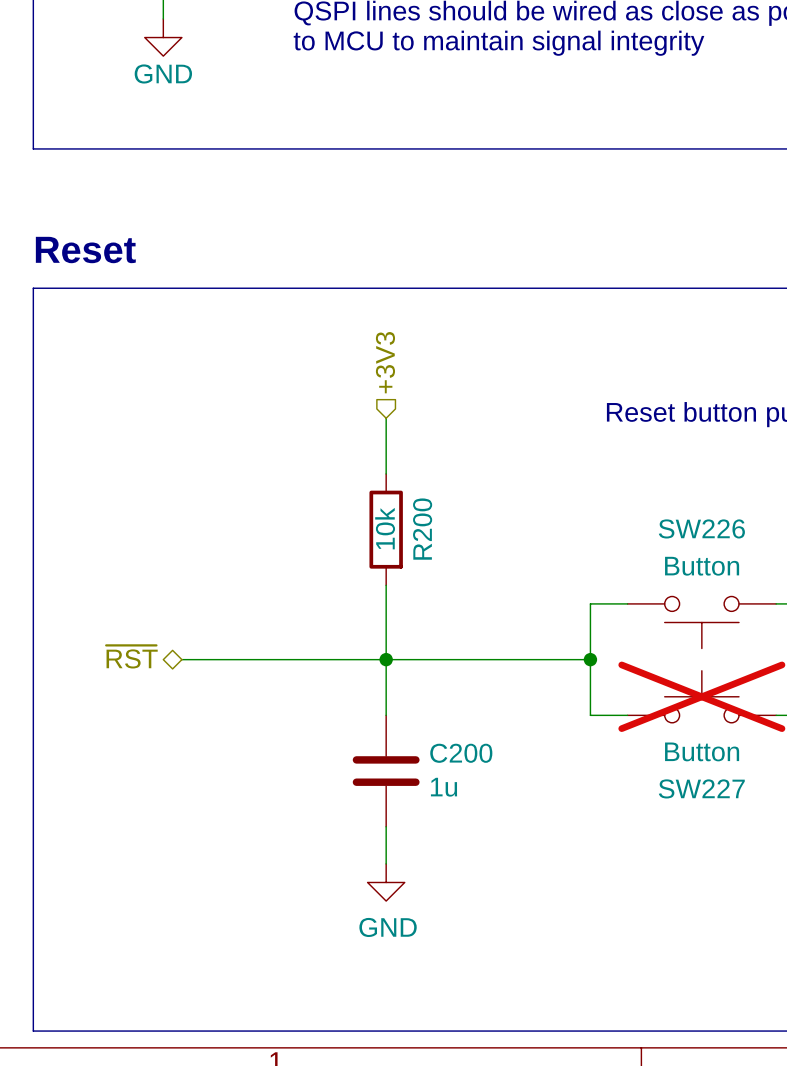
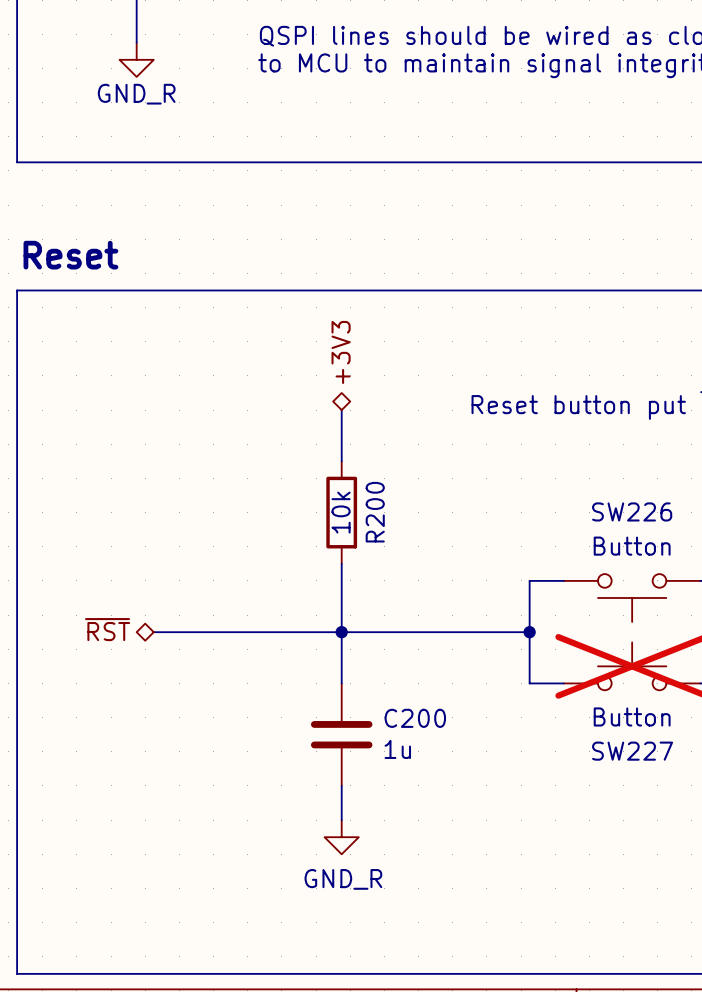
power symbol: GND (163, 37) -> GND_R (136, 59)
hierarchical label shape: input (385, 362) -> bidirectional (341, 352)
power symbol: GND (386, 882) -> GND_R (341, 837)

